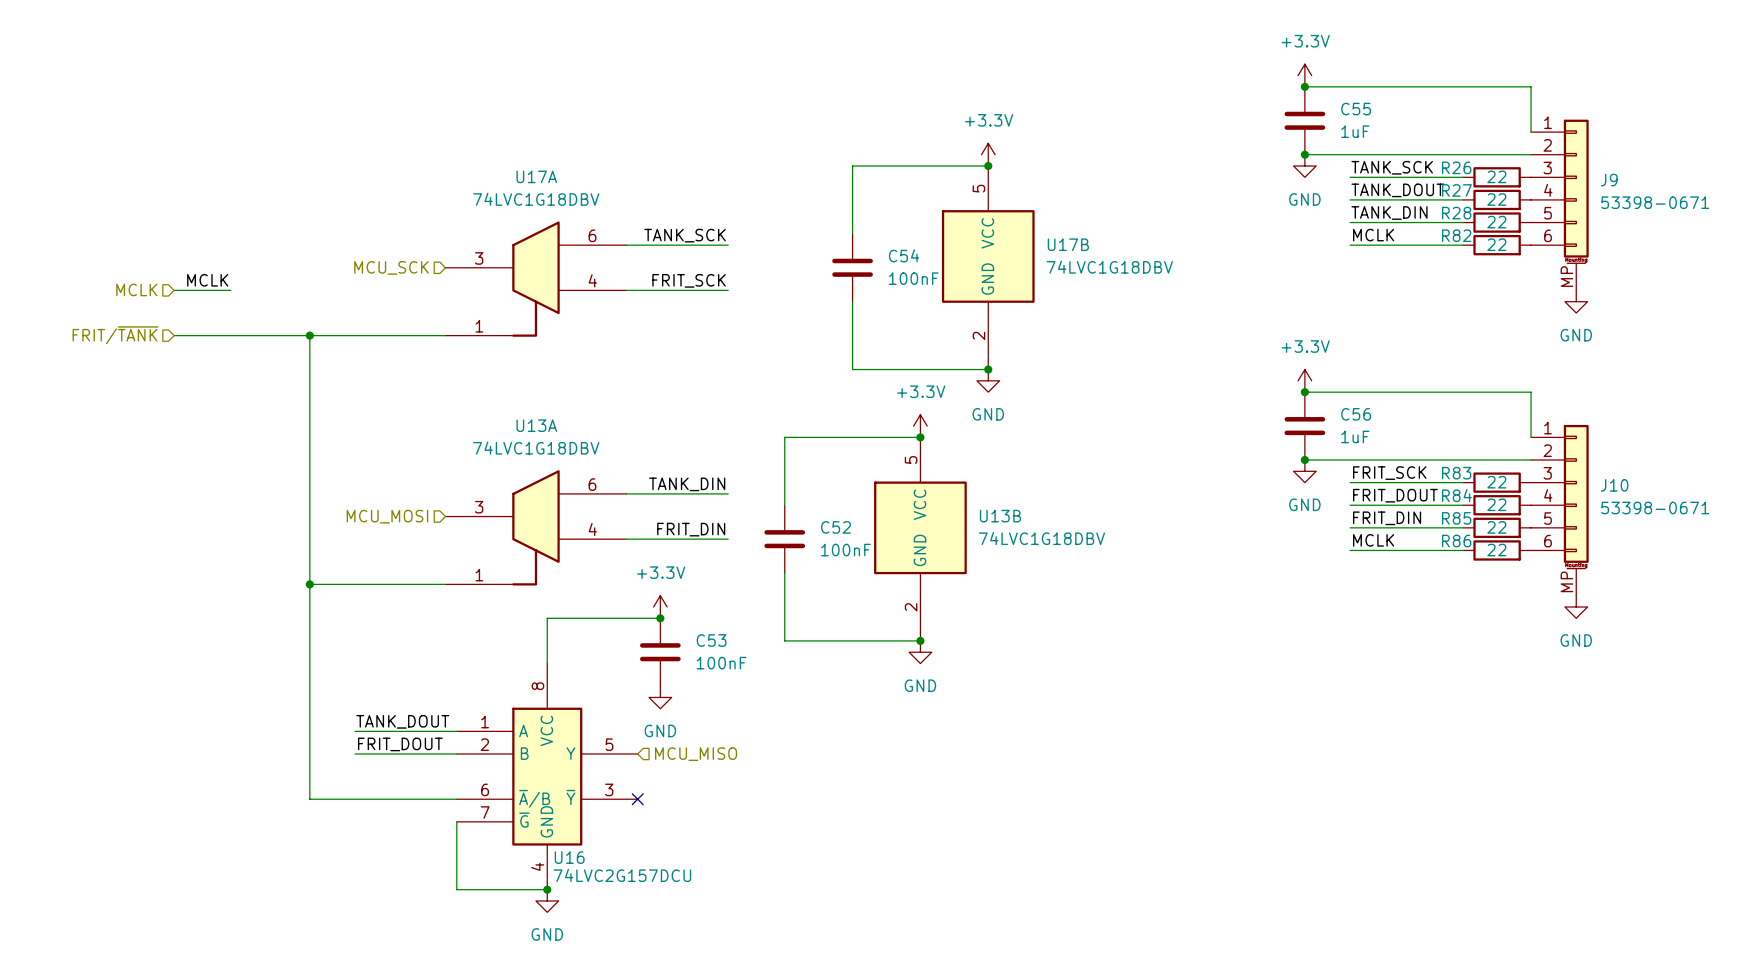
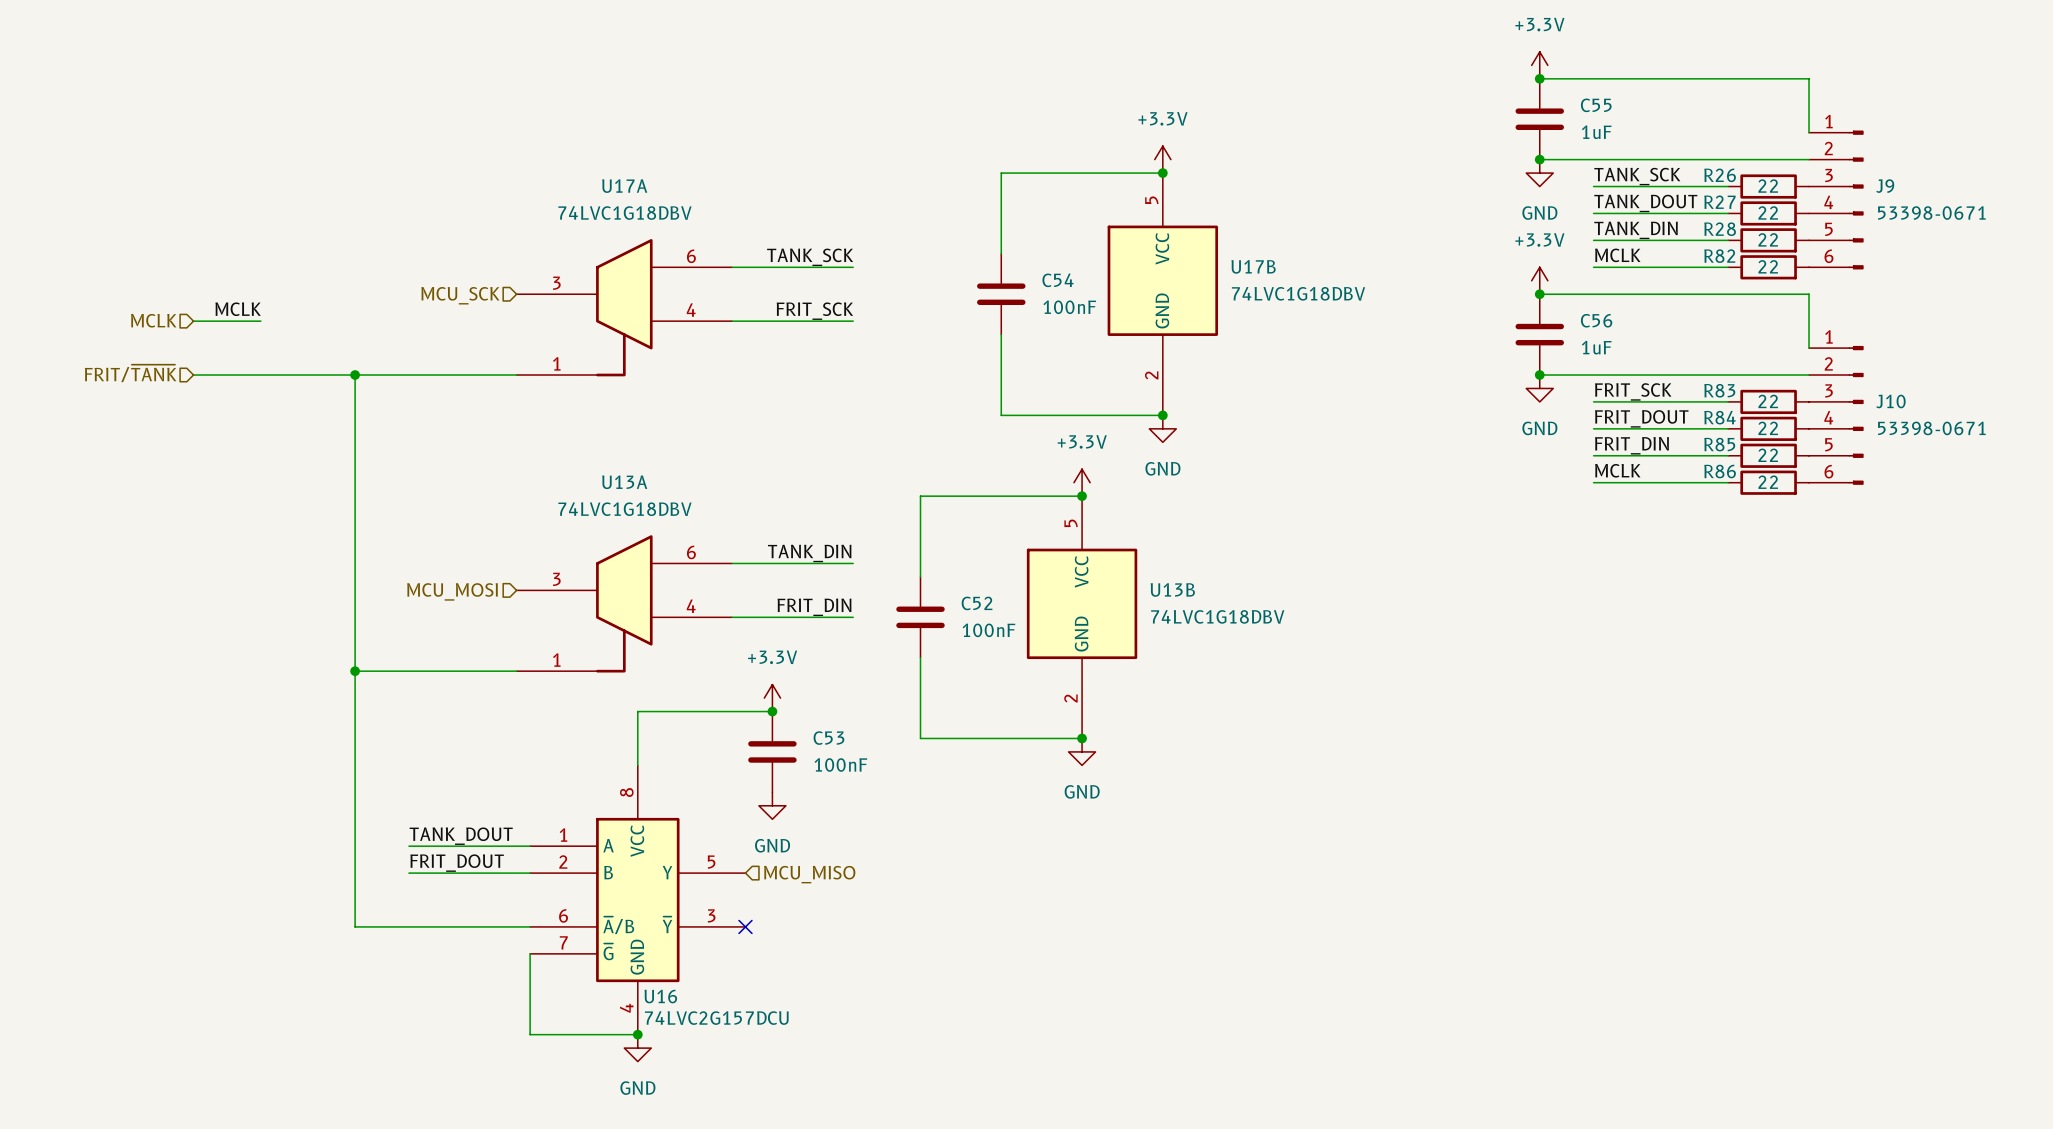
J9 symbol: [1531, 119, 1589, 291] -> [1809, 130, 1864, 270]
junction: none -> (1539, 294)
power symbol: GND (1576, 301) -> none
junction: none -> (1539, 375)
power symbol position: +3.3V (1304, 380) -> +3.3V (1539, 280)
wire: (1304, 392) (1531, 392) (1531, 437) -> (1539, 294) (1809, 294) (1809, 348)
junction: (1304, 392) -> none
J10 symbol: [1531, 424, 1589, 596] -> [1809, 345, 1864, 485]
C56 position: (1304, 426) -> (1539, 334)
wire: (1304, 460) (1531, 460) -> (1539, 375) (1809, 375)
junction: (1304, 460) -> none
power symbol position: GND (1304, 471) -> GND (1539, 388)
label position: FRIT_SCK (1389, 473) -> FRIT_SCK (1633, 391)
wire: (1350, 482) (1463, 482) -> (1593, 401) (1728, 401)
R83 position: (1497, 482) -> (1768, 401)
label position: FRIT_DOUT (1395, 495) -> FRIT_DOUT (1641, 418)
wire: (1350, 505) (1463, 505) -> (1593, 428) (1728, 428)
R84 position: (1497, 505) -> (1768, 428)
label position: FRIT_DIN (1387, 518) -> FRIT_DIN (1631, 445)
wire: (1350, 527) (1463, 527) -> (1593, 455) (1728, 455)
R85 position: (1497, 527) -> (1768, 455)
label position: MCLK (1373, 540) -> MCLK (1617, 470)
wire: (1350, 550) (1463, 550) -> (1593, 482) (1728, 482)
R86 position: (1497, 550) -> (1768, 482)
power symbol: GND (1576, 607) -> none

